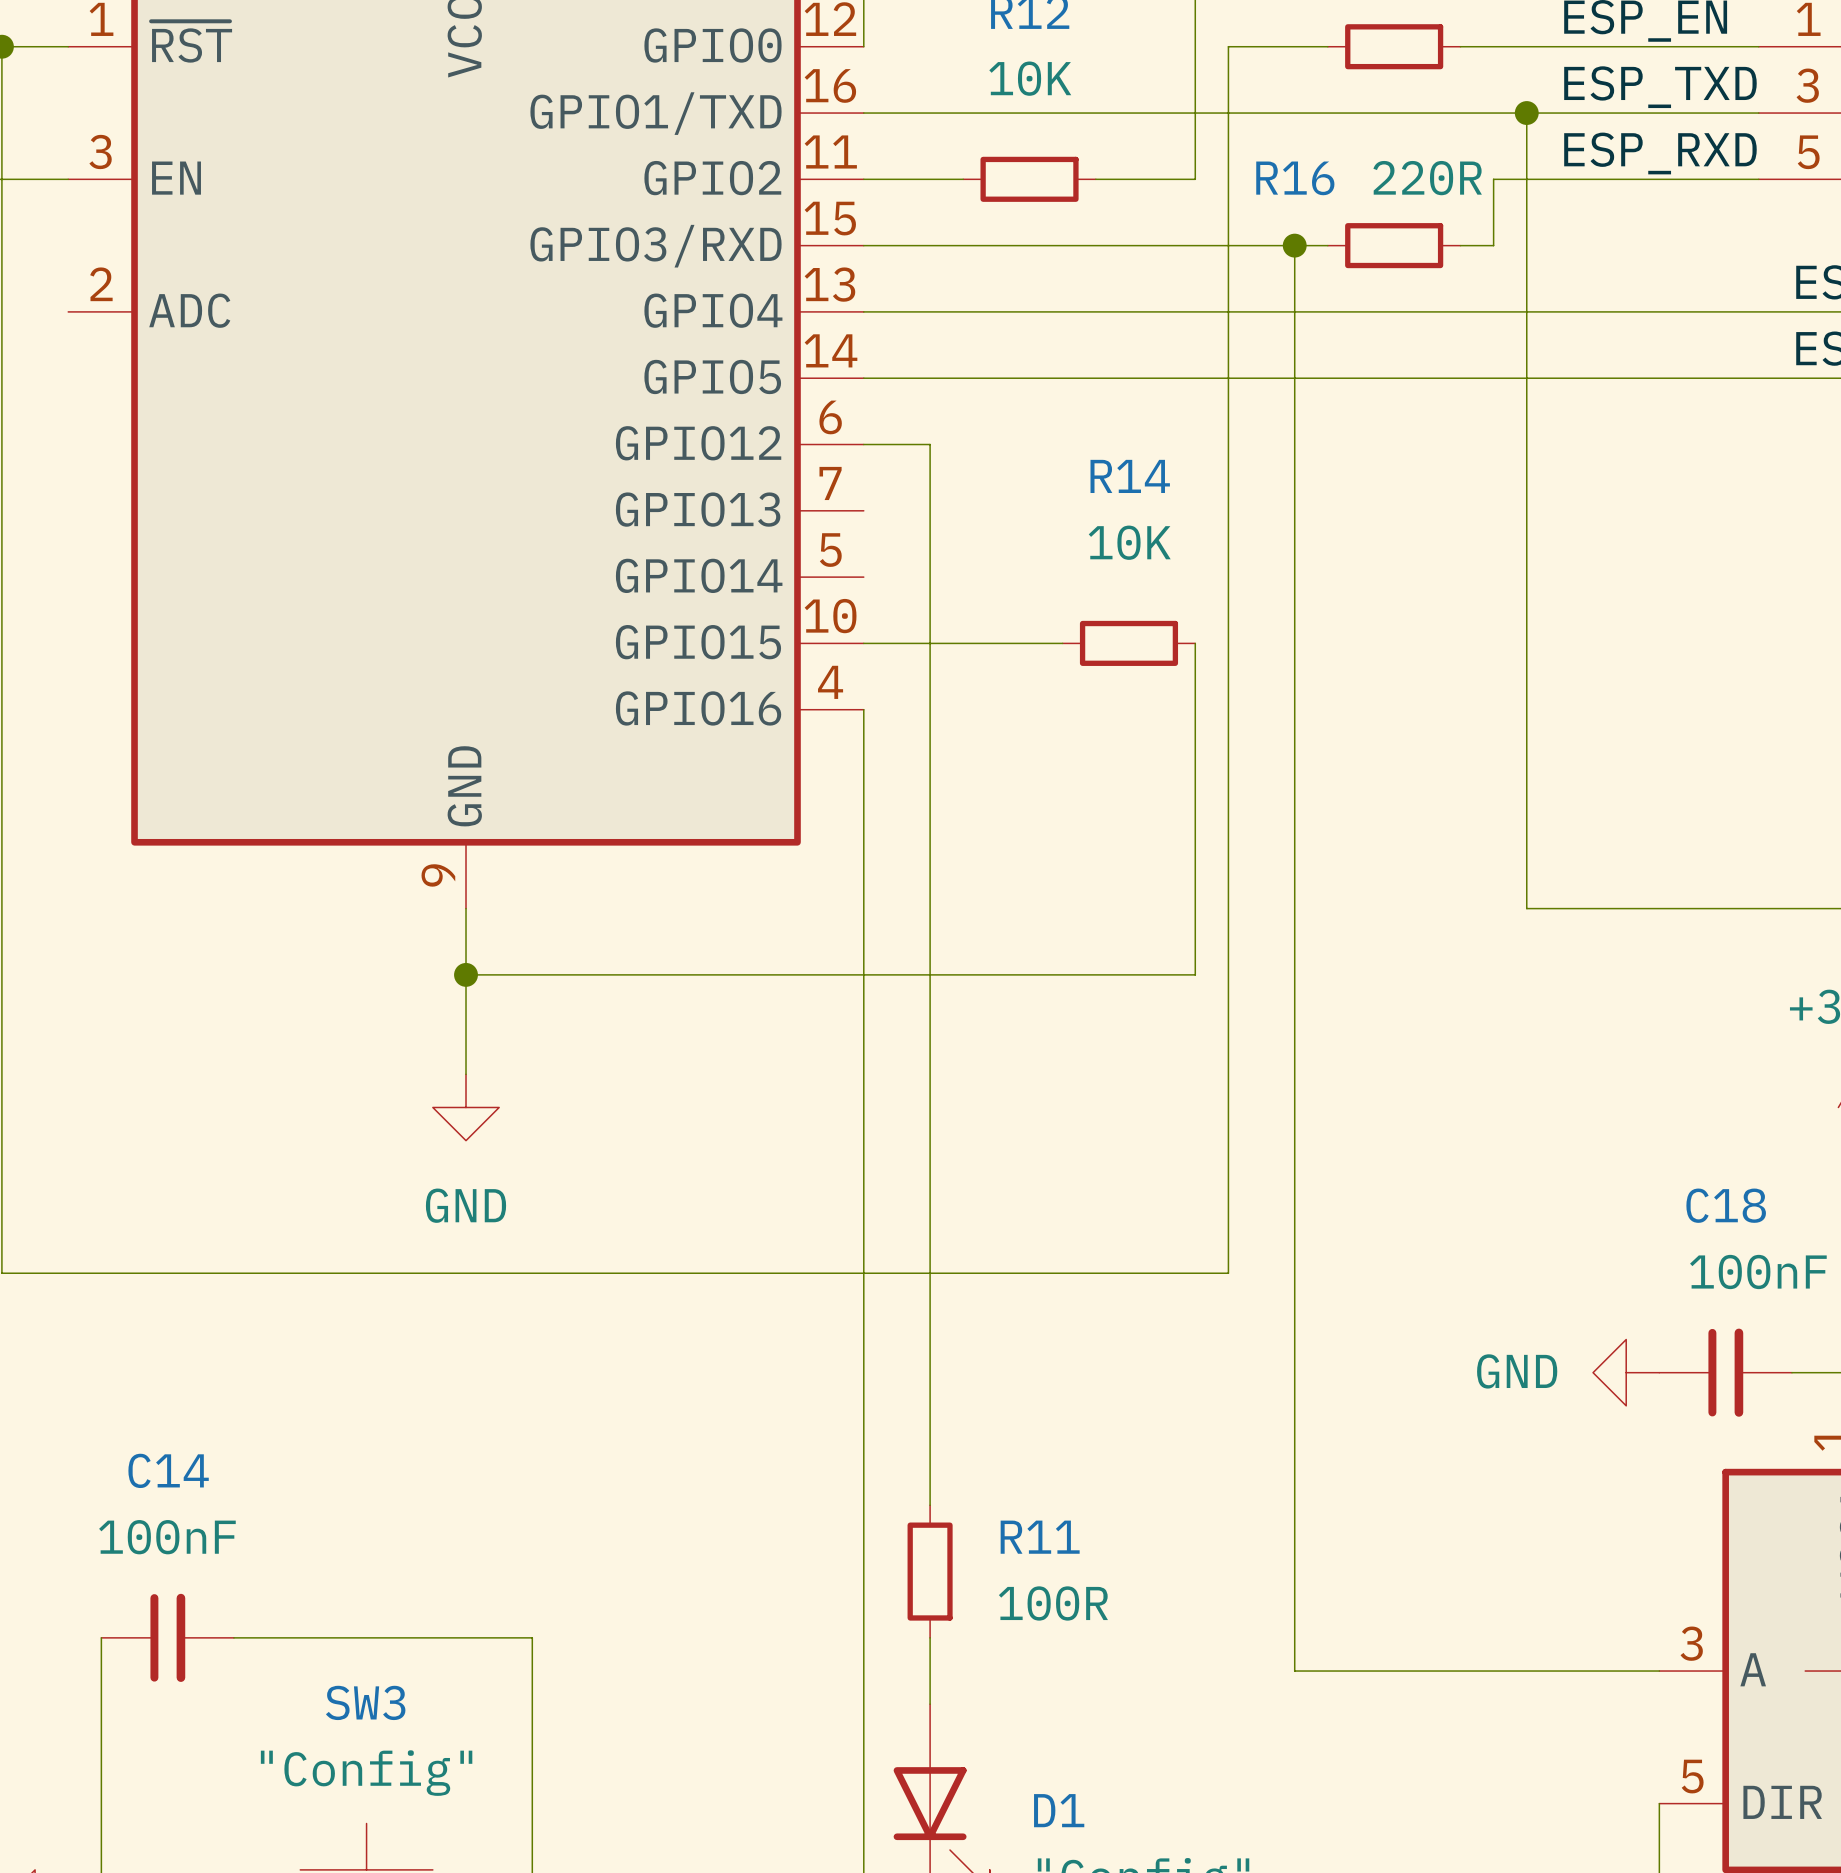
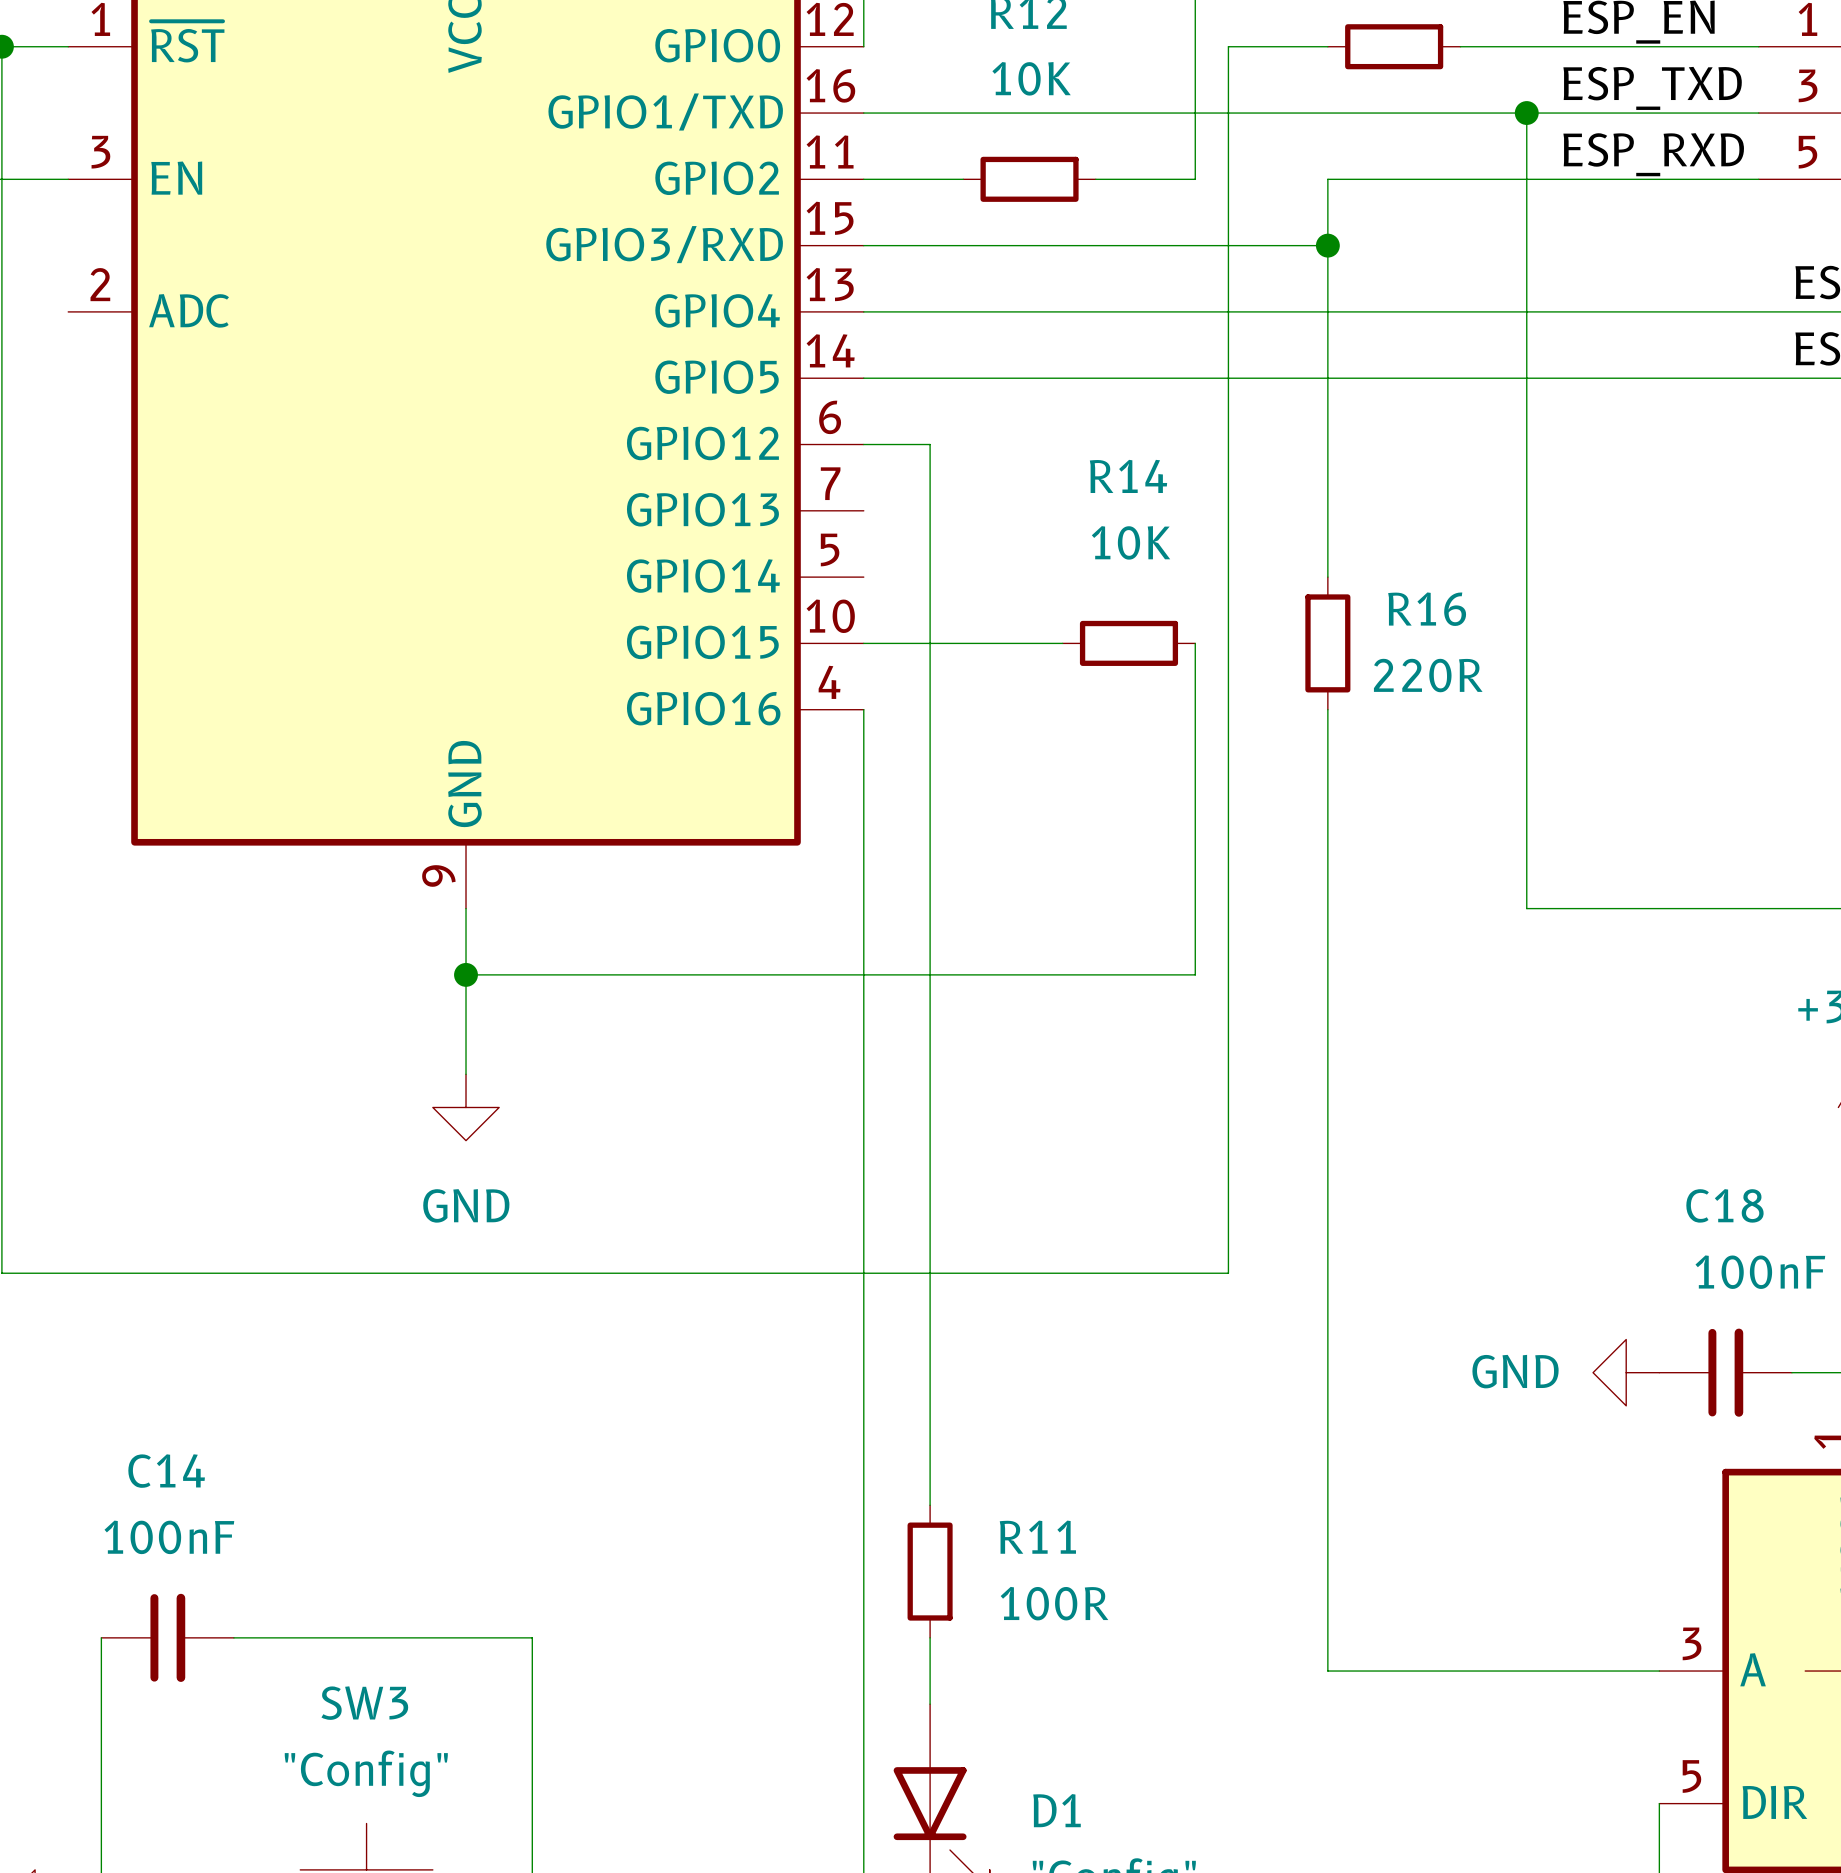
R16 name position: R16 (1295, 178) -> R16 (1427, 609)
wire: (1493, 179) (1493, 245) (1460, 245) -> (1493, 179) (1327, 179) (1327, 577)
wire: (1294, 245) (1294, 1671) (1327, 1671) -> (1327, 709) (1327, 1671)
junction position: (1294, 245) -> (1327, 245)
R16 rotation: 0° (1394, 245) -> 90° clockwise (1327, 643)
R16 position: (1394, 245) -> (1327, 643)

